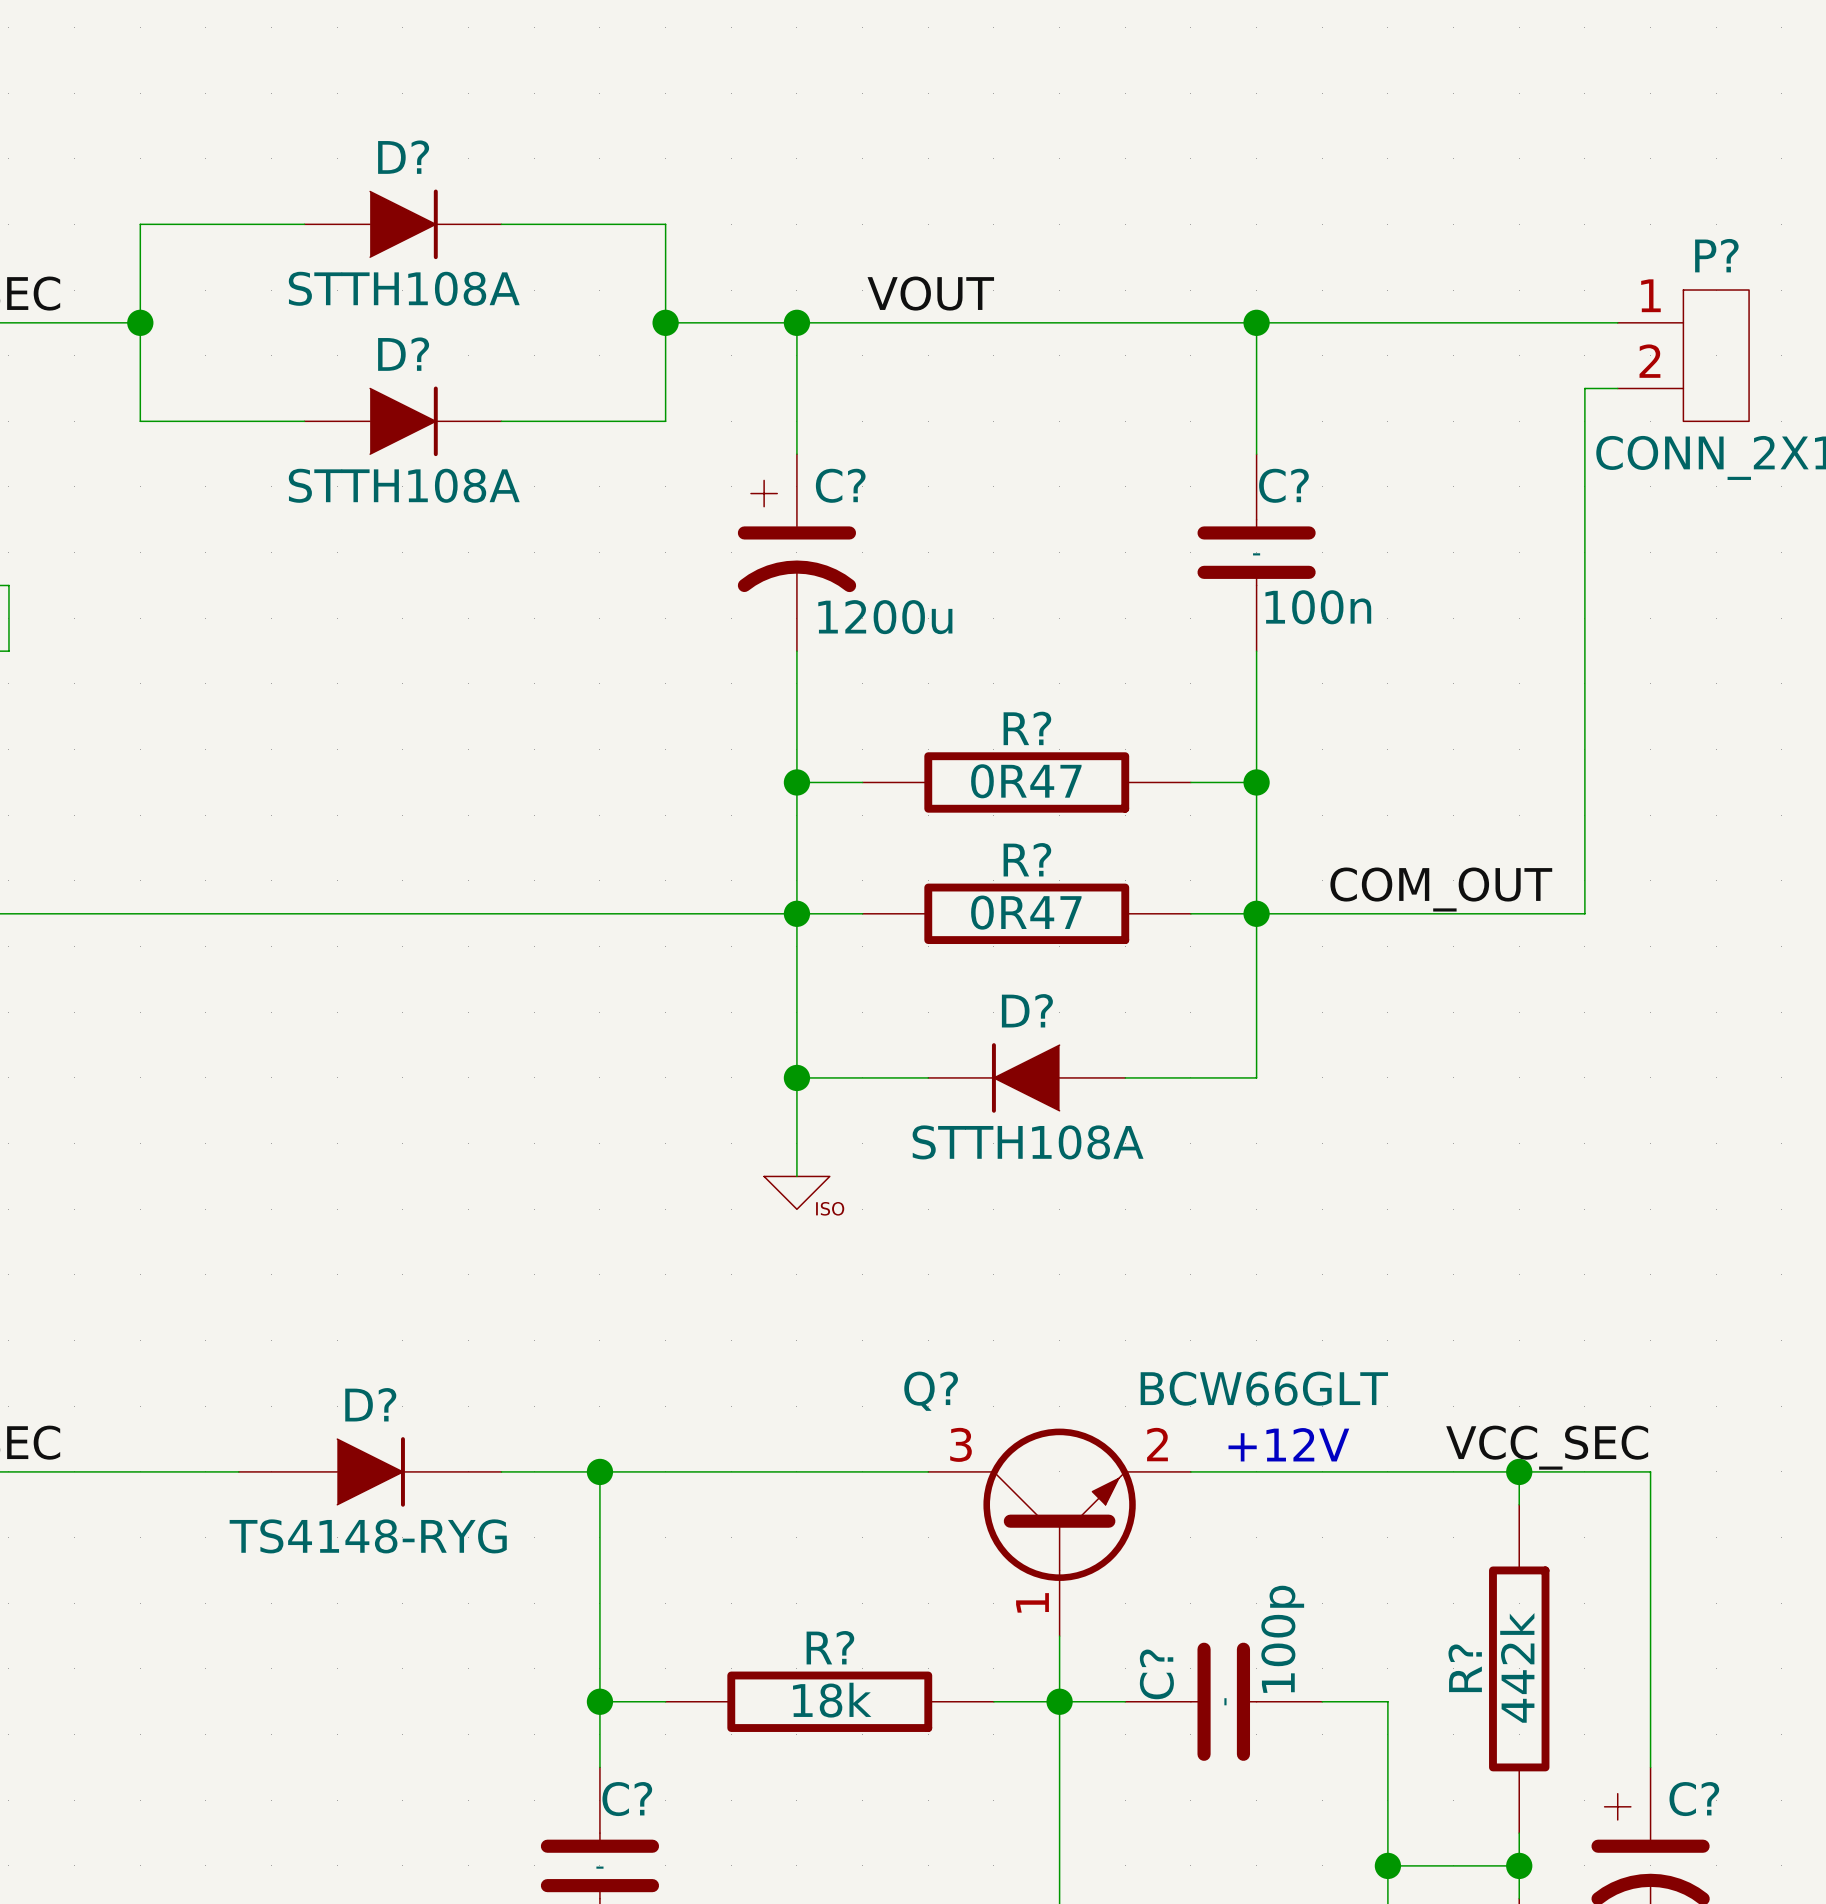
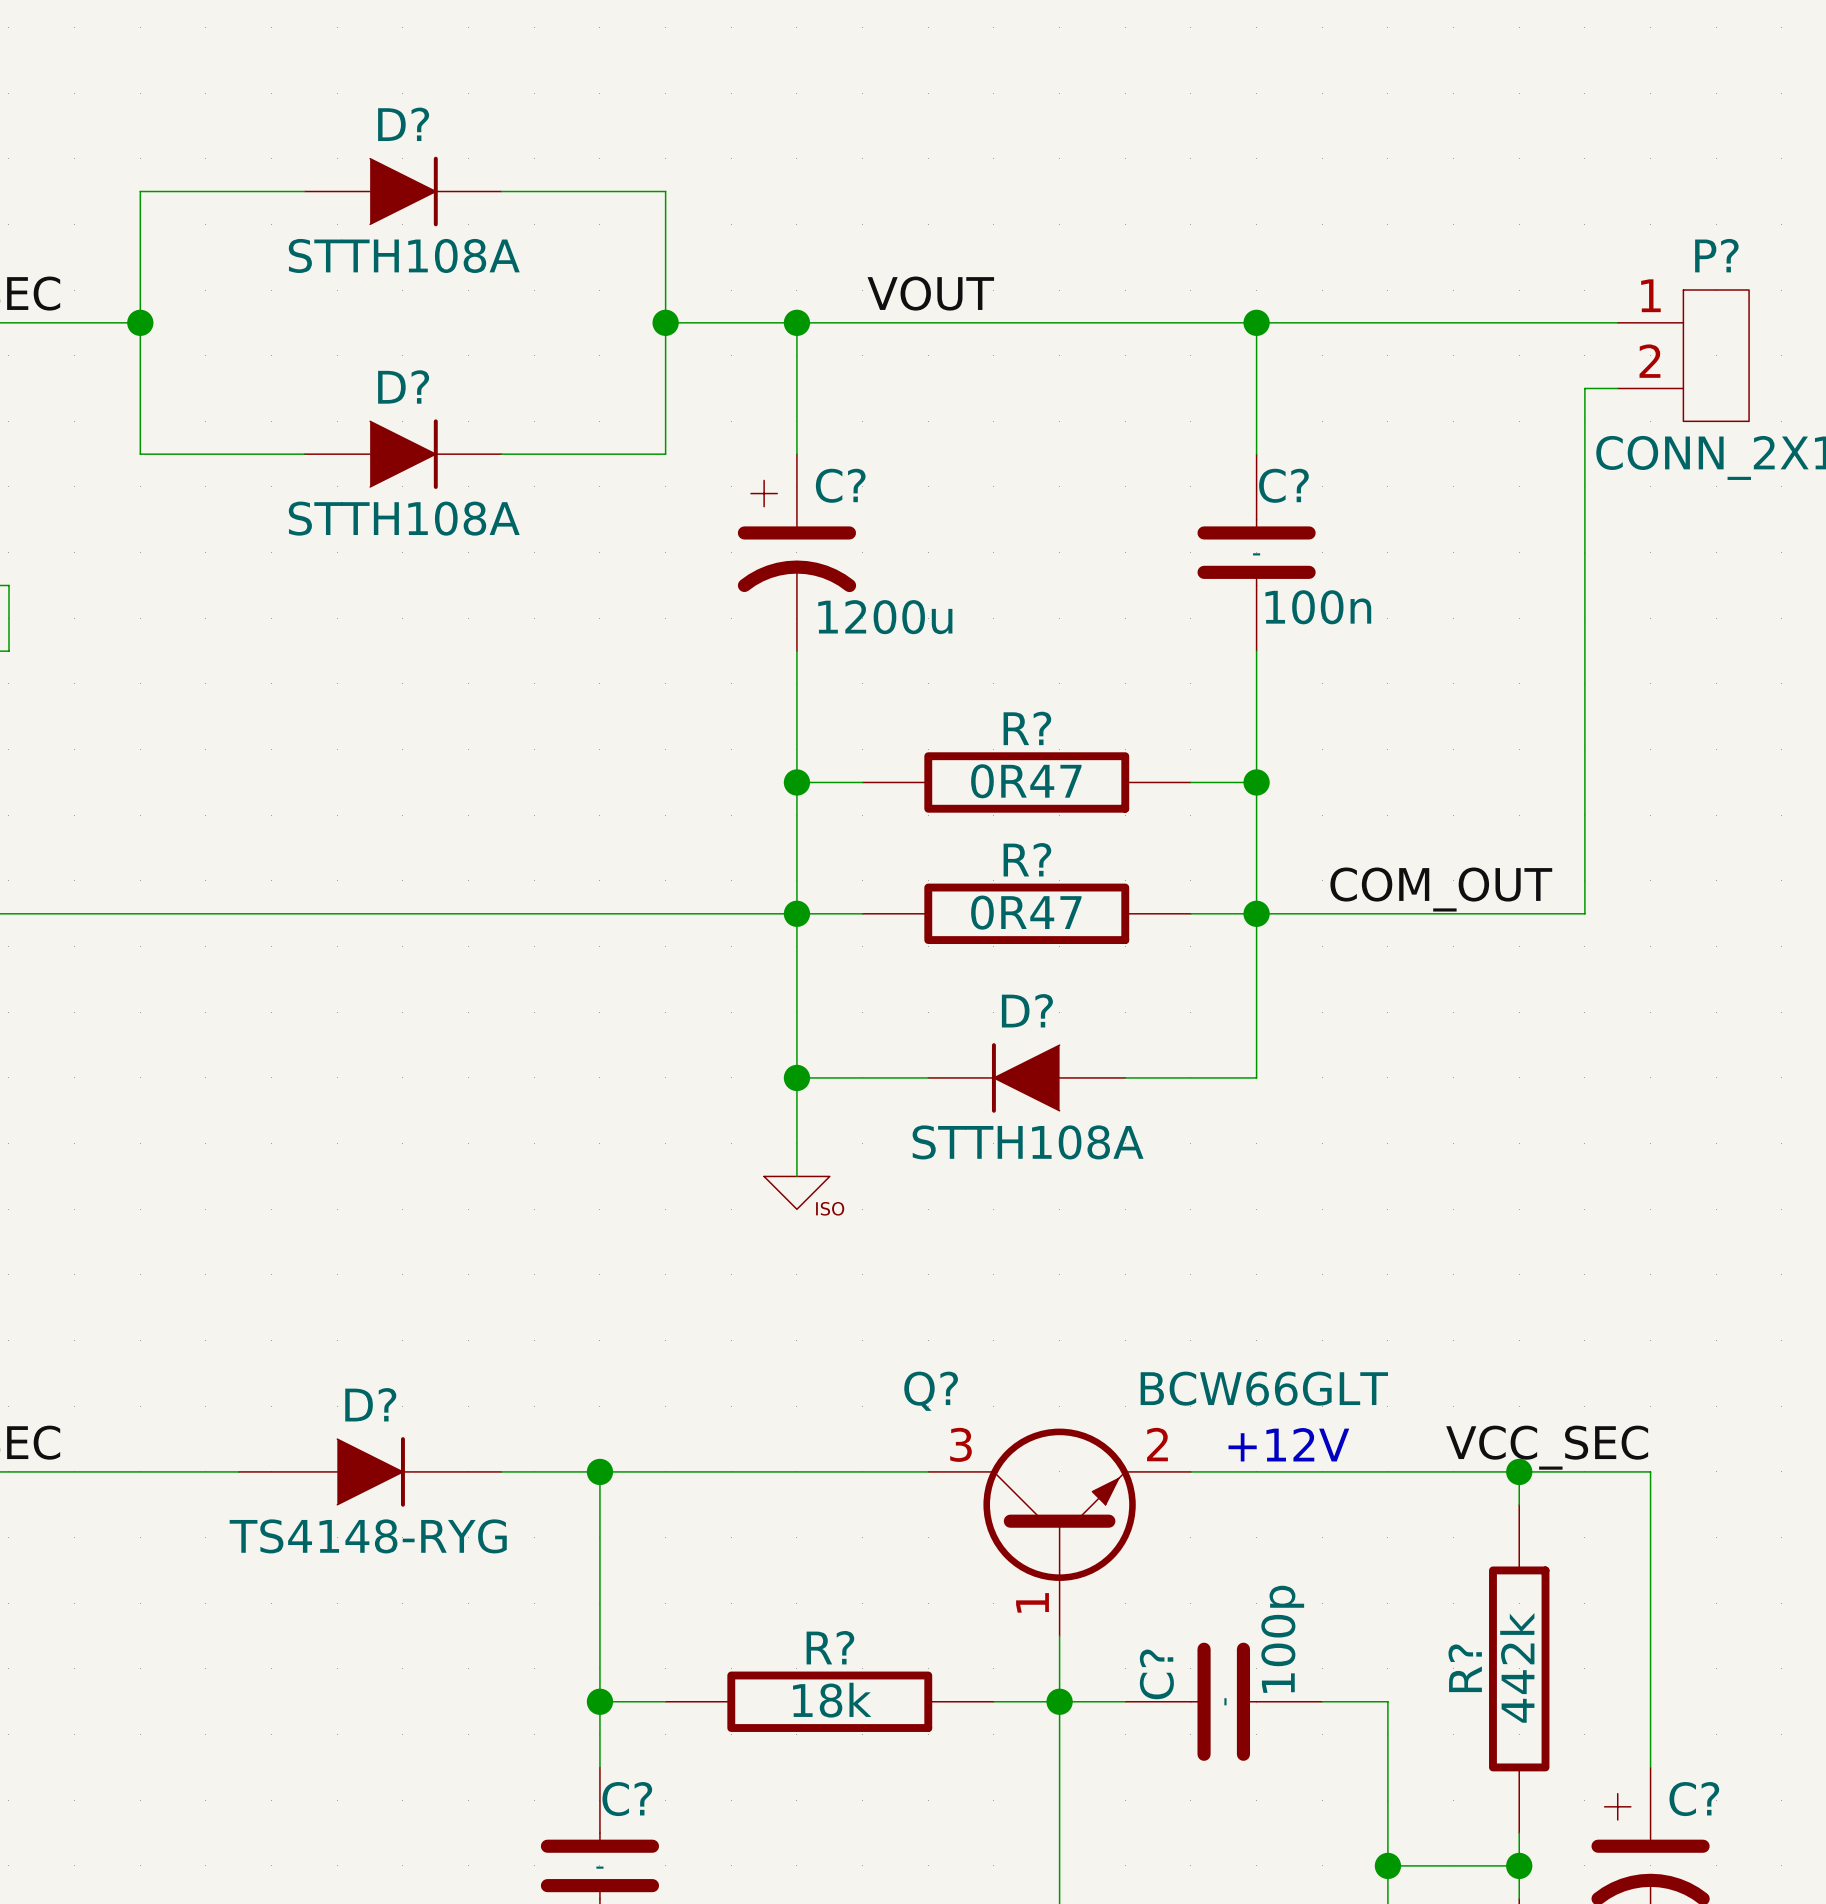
wire: (140, 224) (304, 224) -> (140, 224) (140, 191) (304, 191)
D? position: (402, 224) -> (402, 191)
wire: (501, 224) (665, 224) -> (501, 191) (665, 191) (665, 224)
wire: (140, 421) (304, 421) -> (140, 421) (140, 454) (304, 454)
D? position: (402, 421) -> (402, 454)
wire: (501, 421) (665, 421) -> (501, 454) (665, 454) (665, 421)

